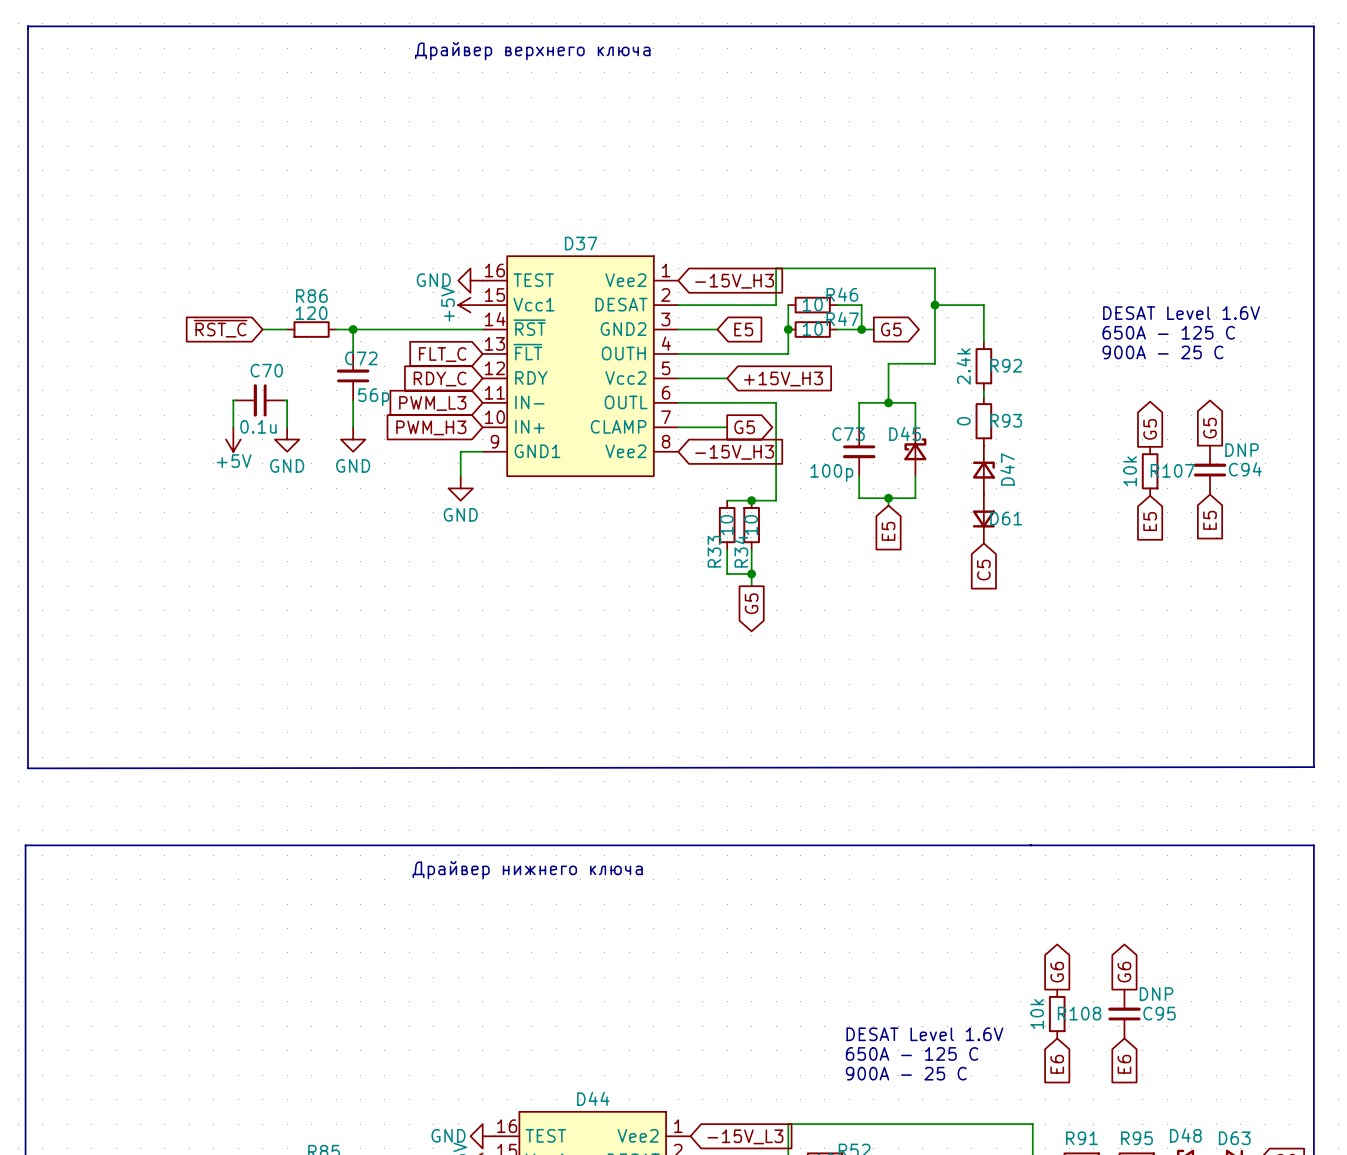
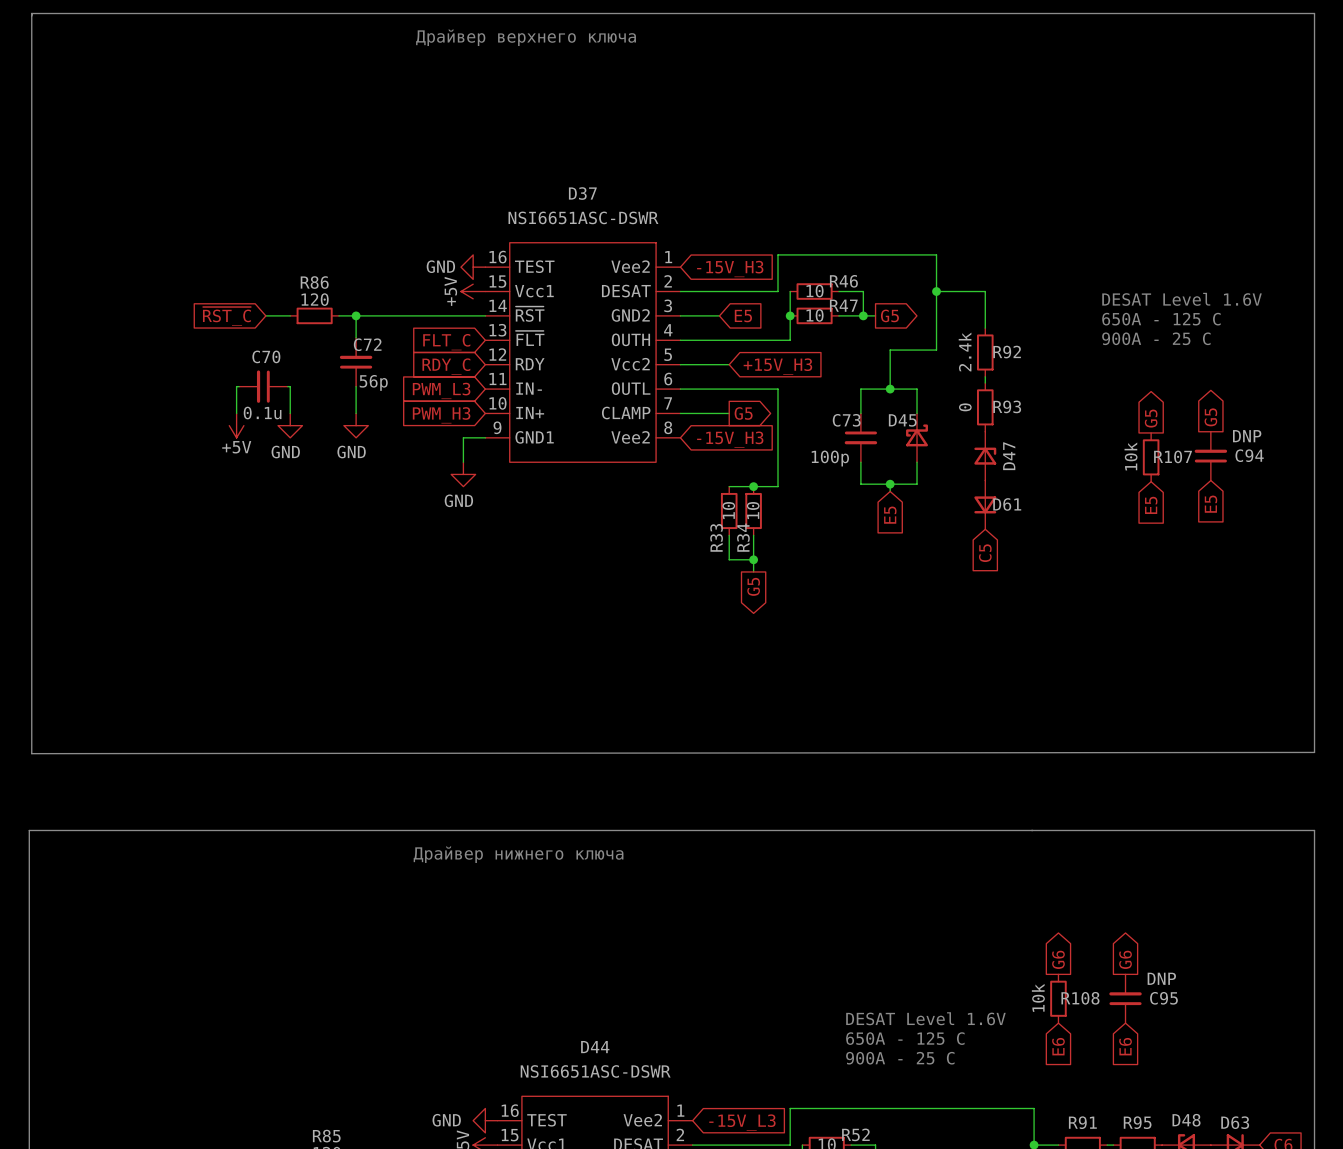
D37 value: none -> NSI6651ASC-DSWR (583, 217)
D37 name position: D37 (581, 243) -> D37 (582, 193)
D44 value: none -> NSI6651ASC-DSWR (595, 1071)
D44 name position: D44 (593, 1098) -> D44 (595, 1047)

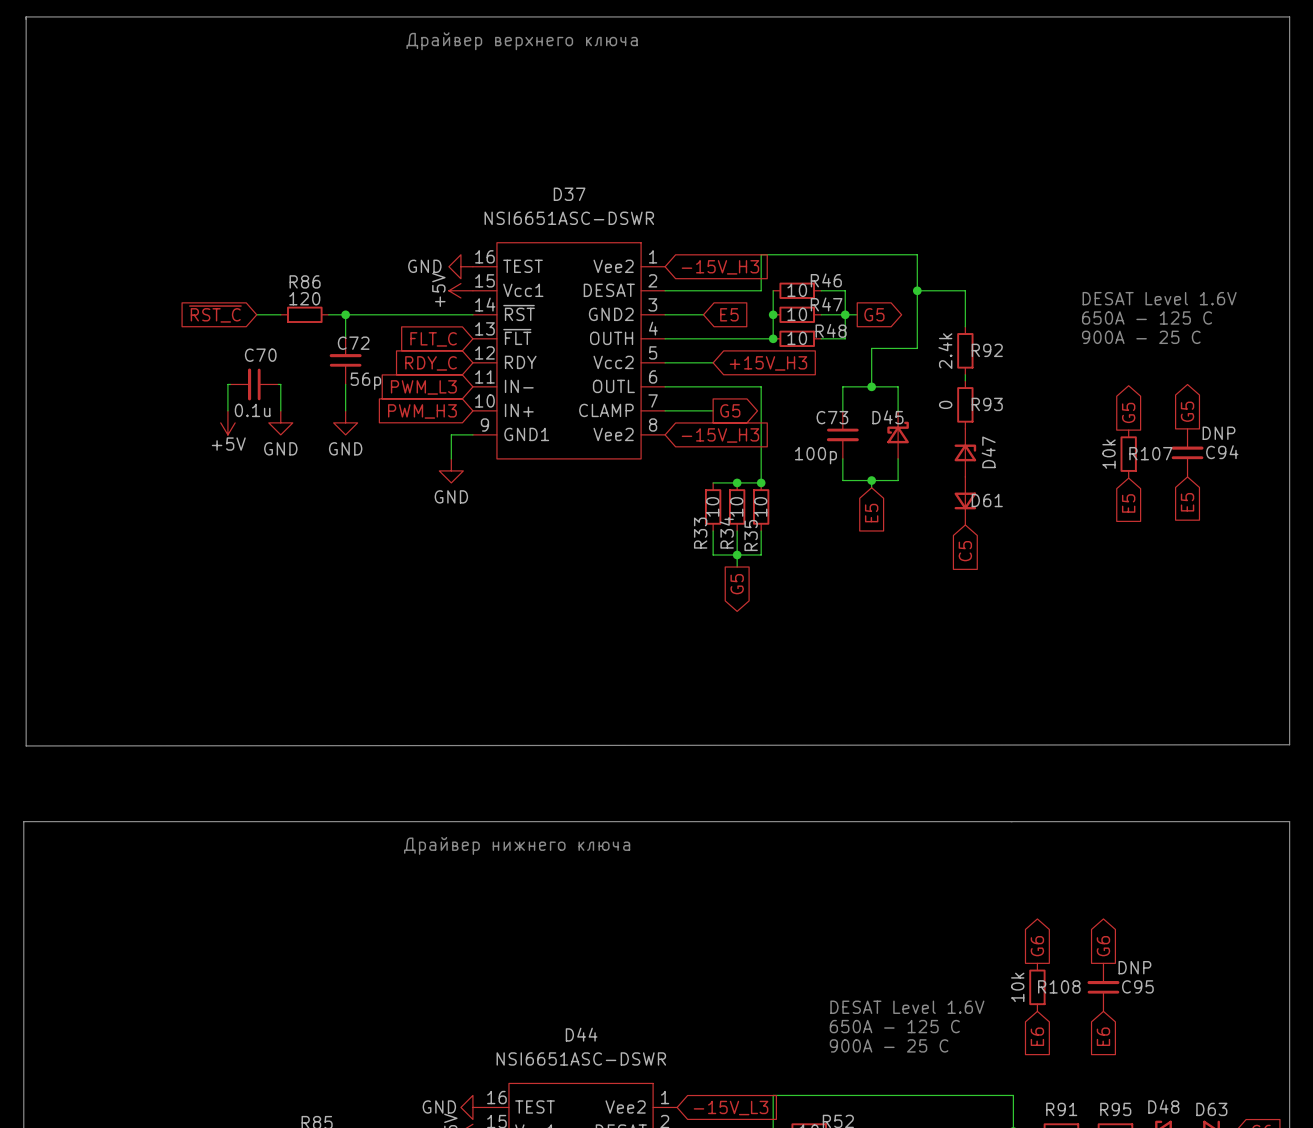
wire: none -> (845, 314) (845, 338) (821, 338)
junction: none -> (773, 338)
R48: none -> 10 (797, 338)
junction: none -> (761, 482)
R35: none -> 10 (761, 506)
wire: none -> (761, 530) (761, 555) (737, 555)

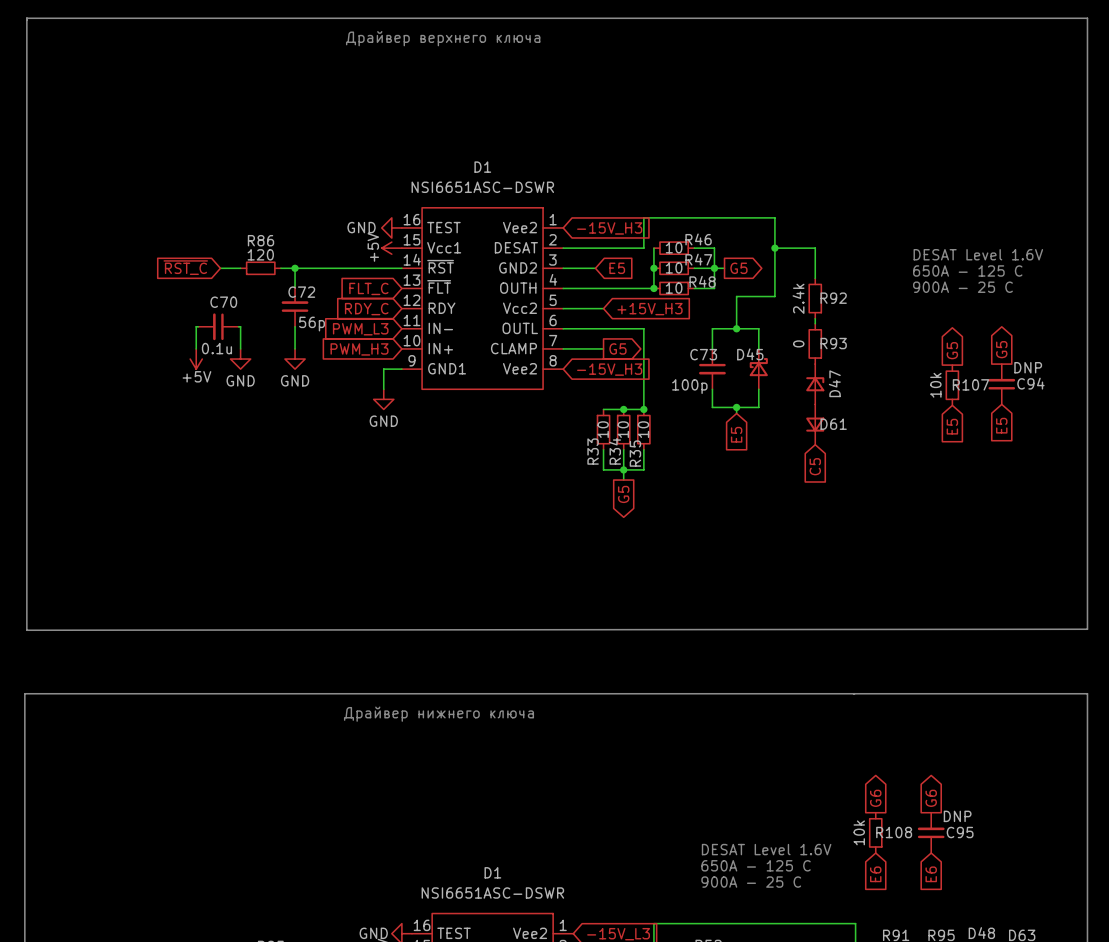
D37 name: D37 (569, 194) -> D1 (482, 167)
D44 name: D44 (581, 1034) -> D1 (492, 872)

